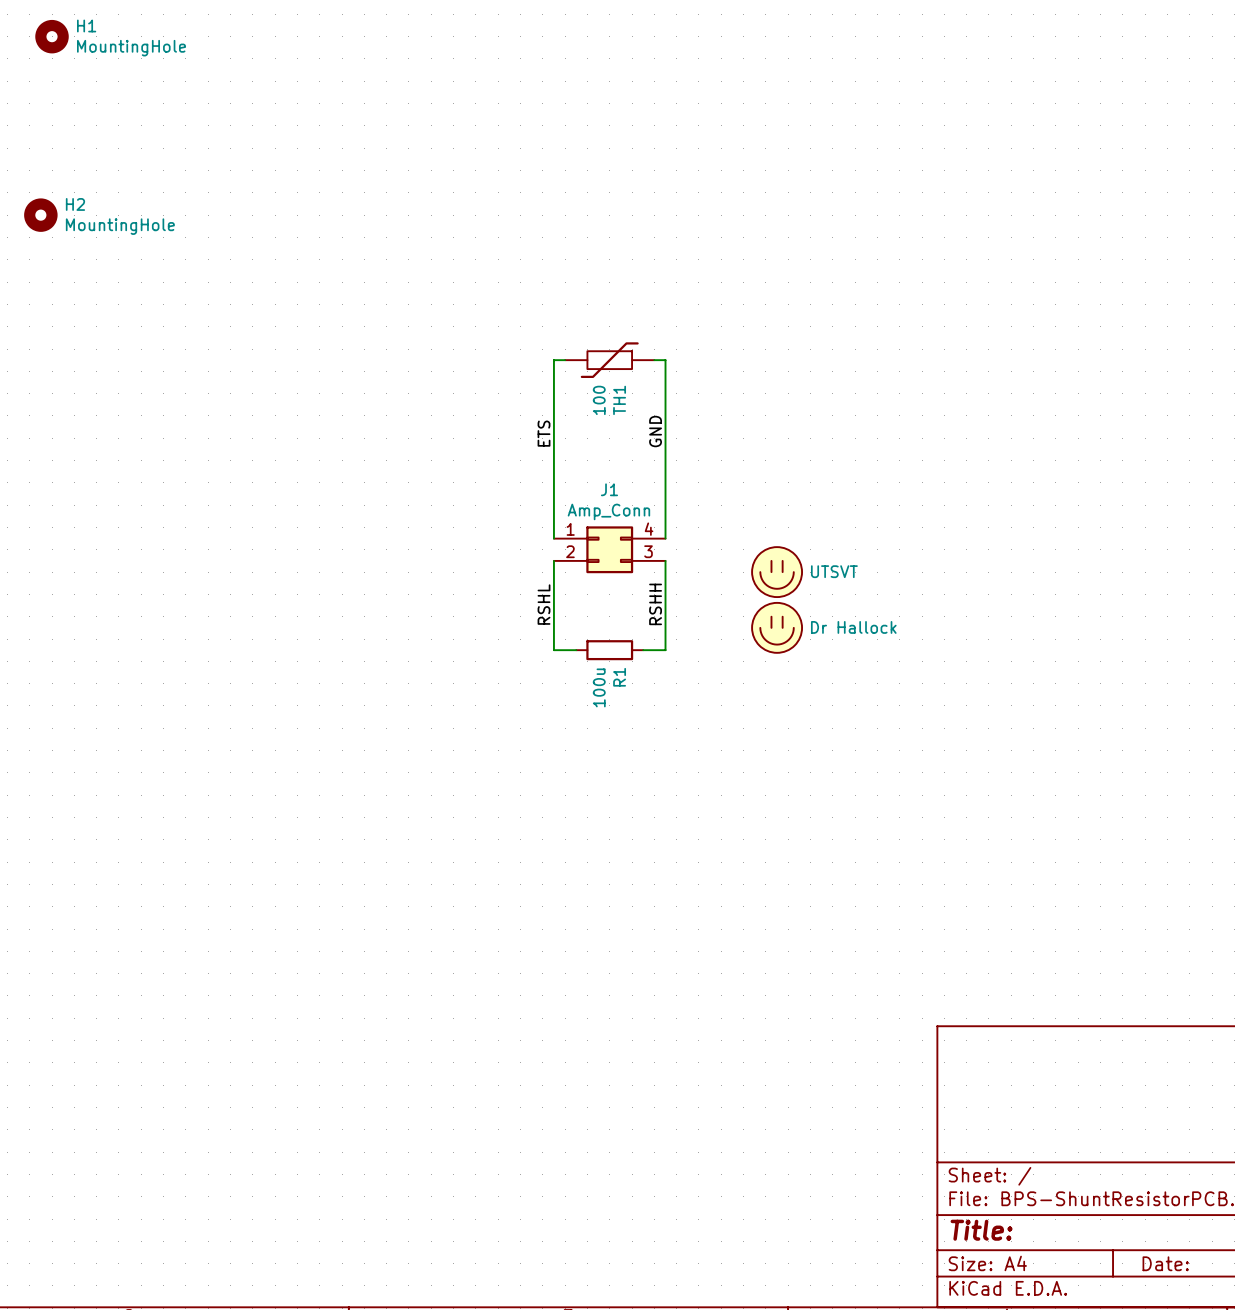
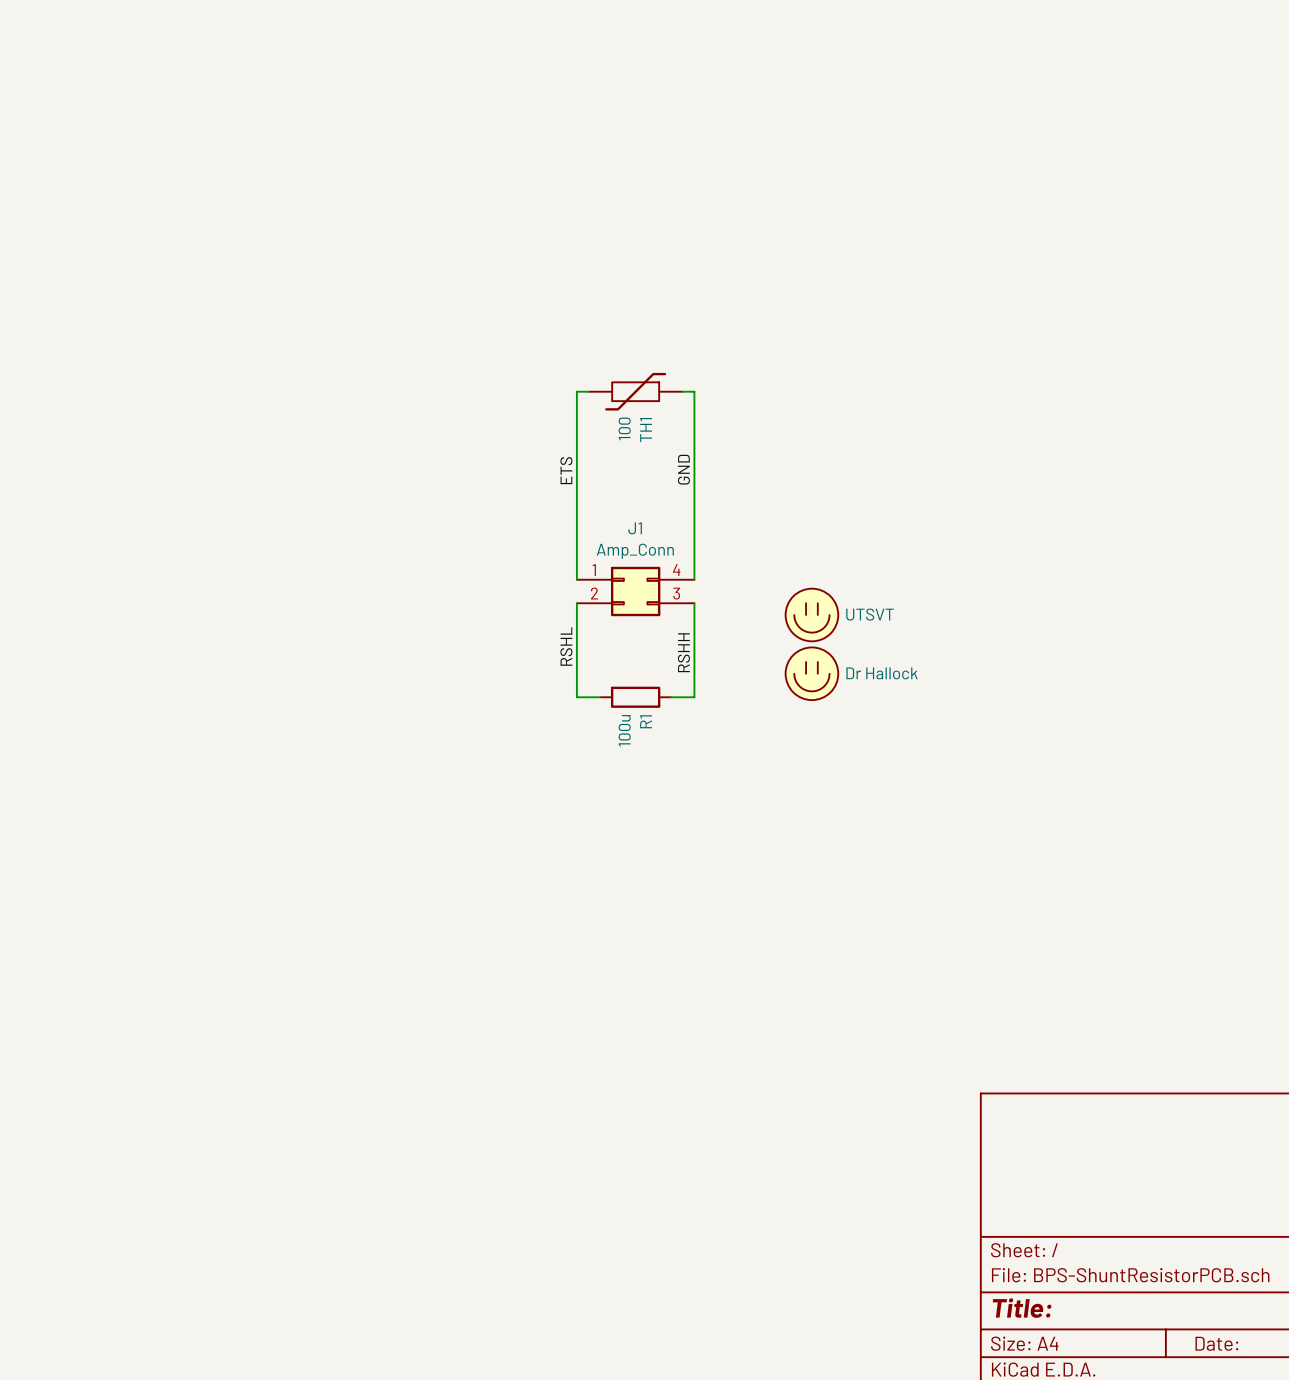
H1: MountingHole (52, 36) -> none
H2: MountingHole (40, 215) -> none

